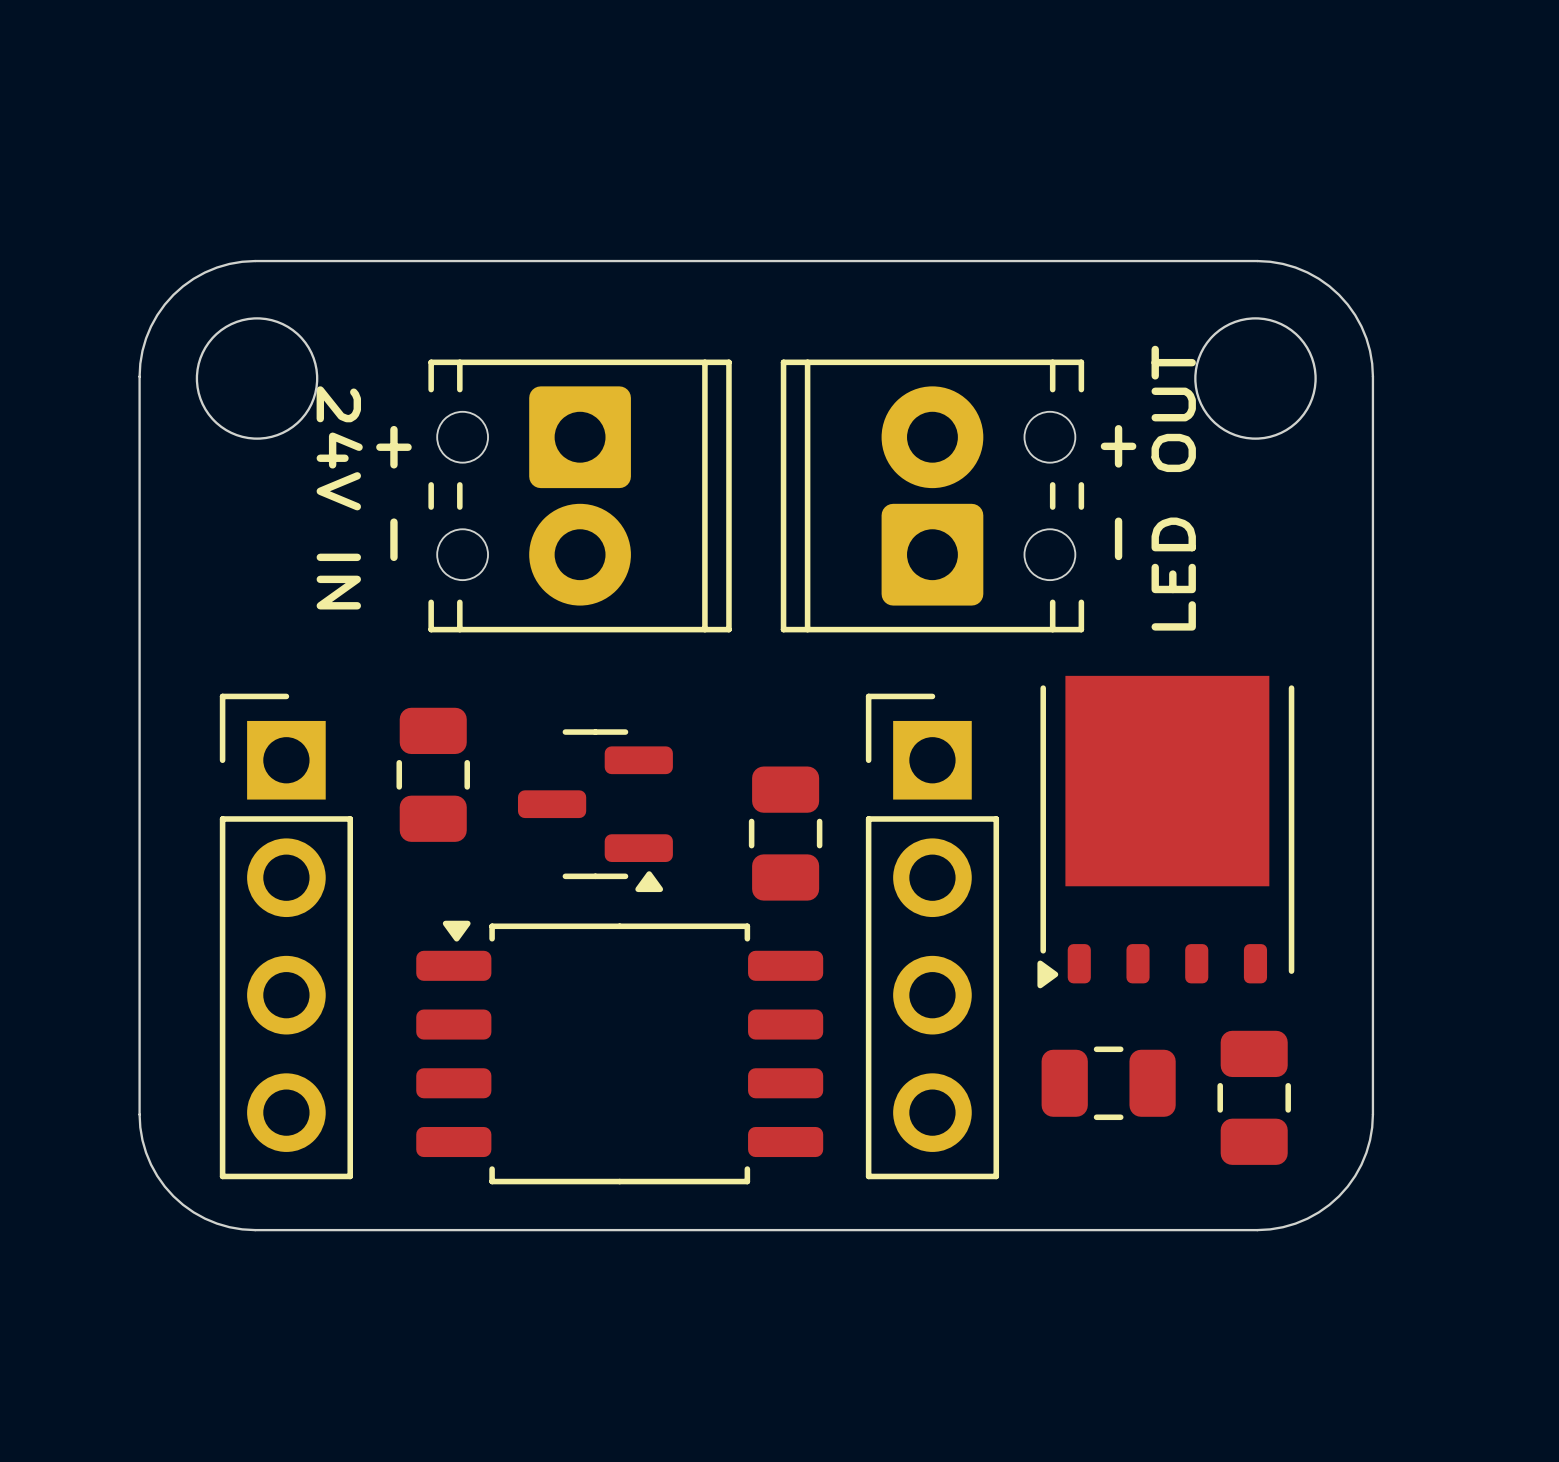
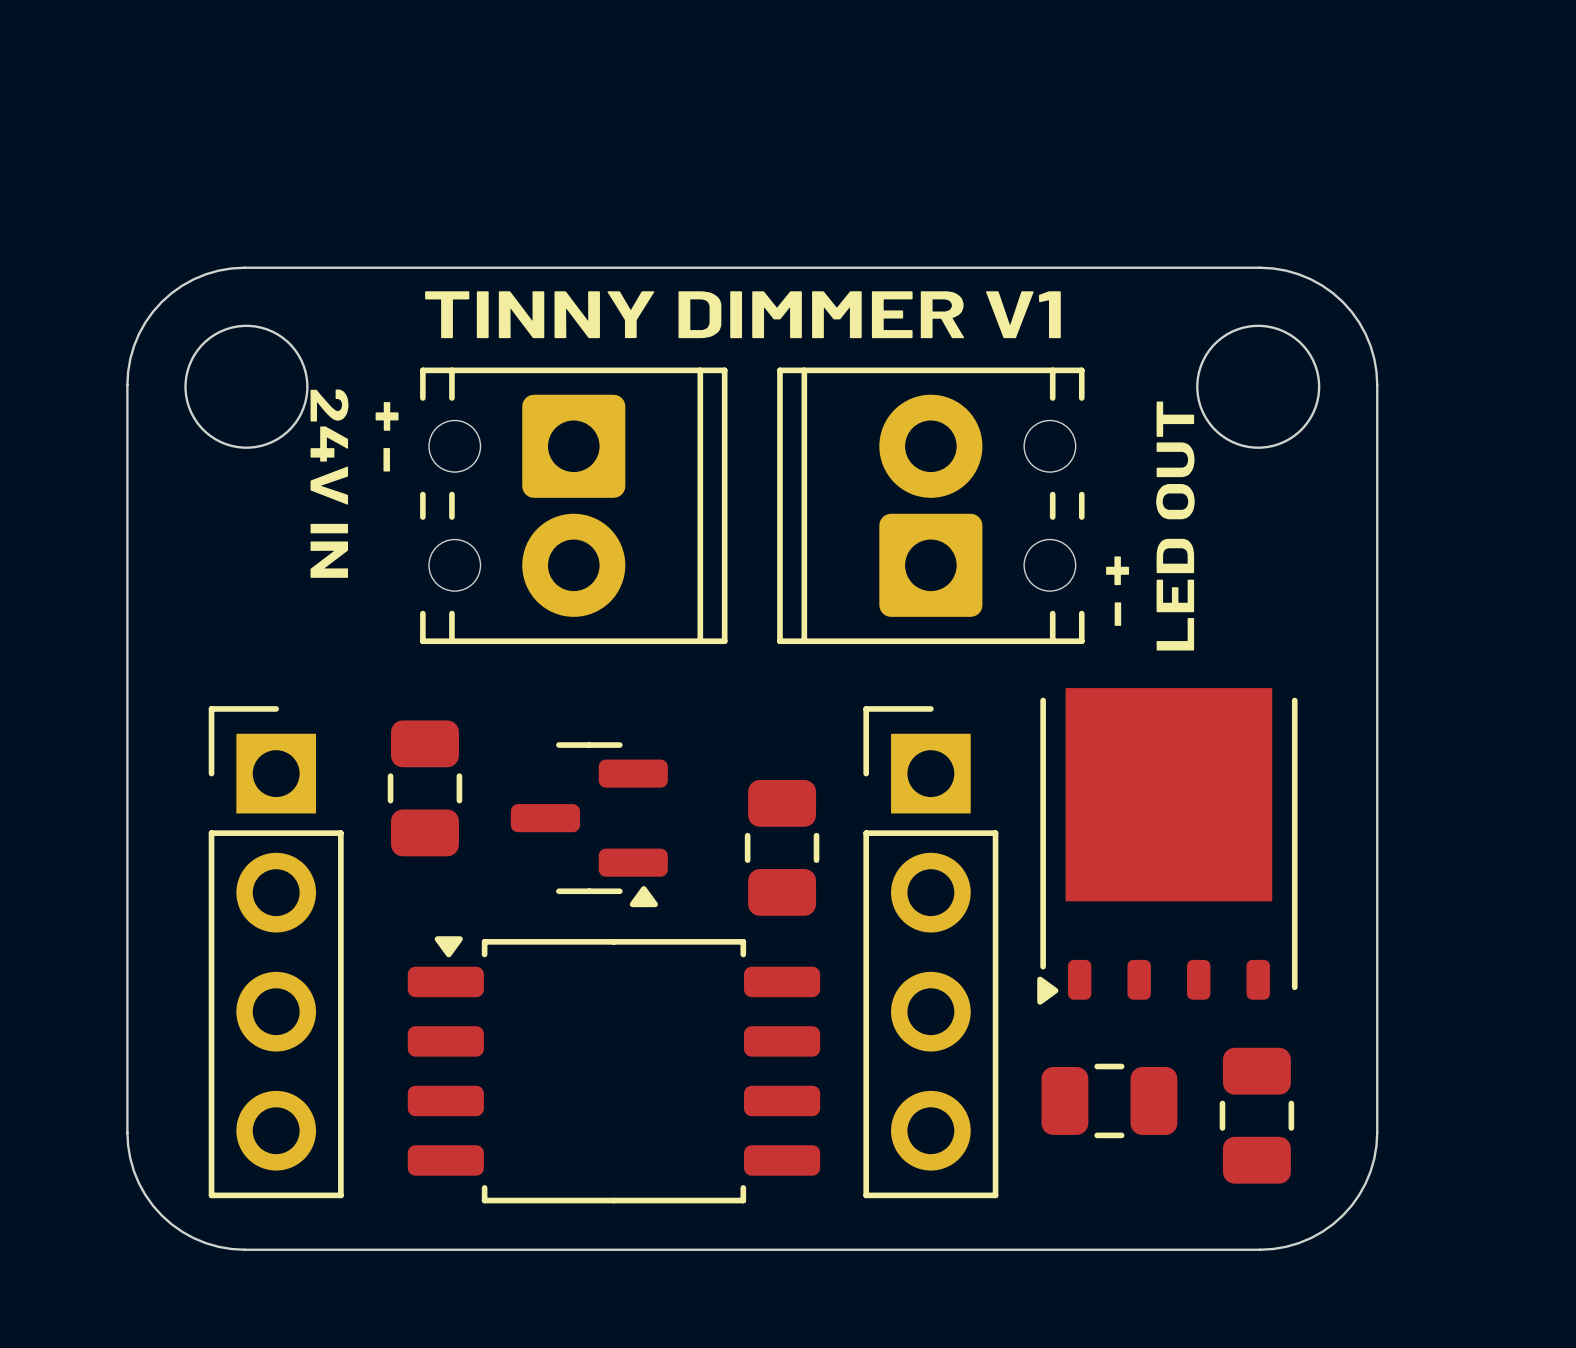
text: none -> TINNY DIMMER V1 (742, 314)

